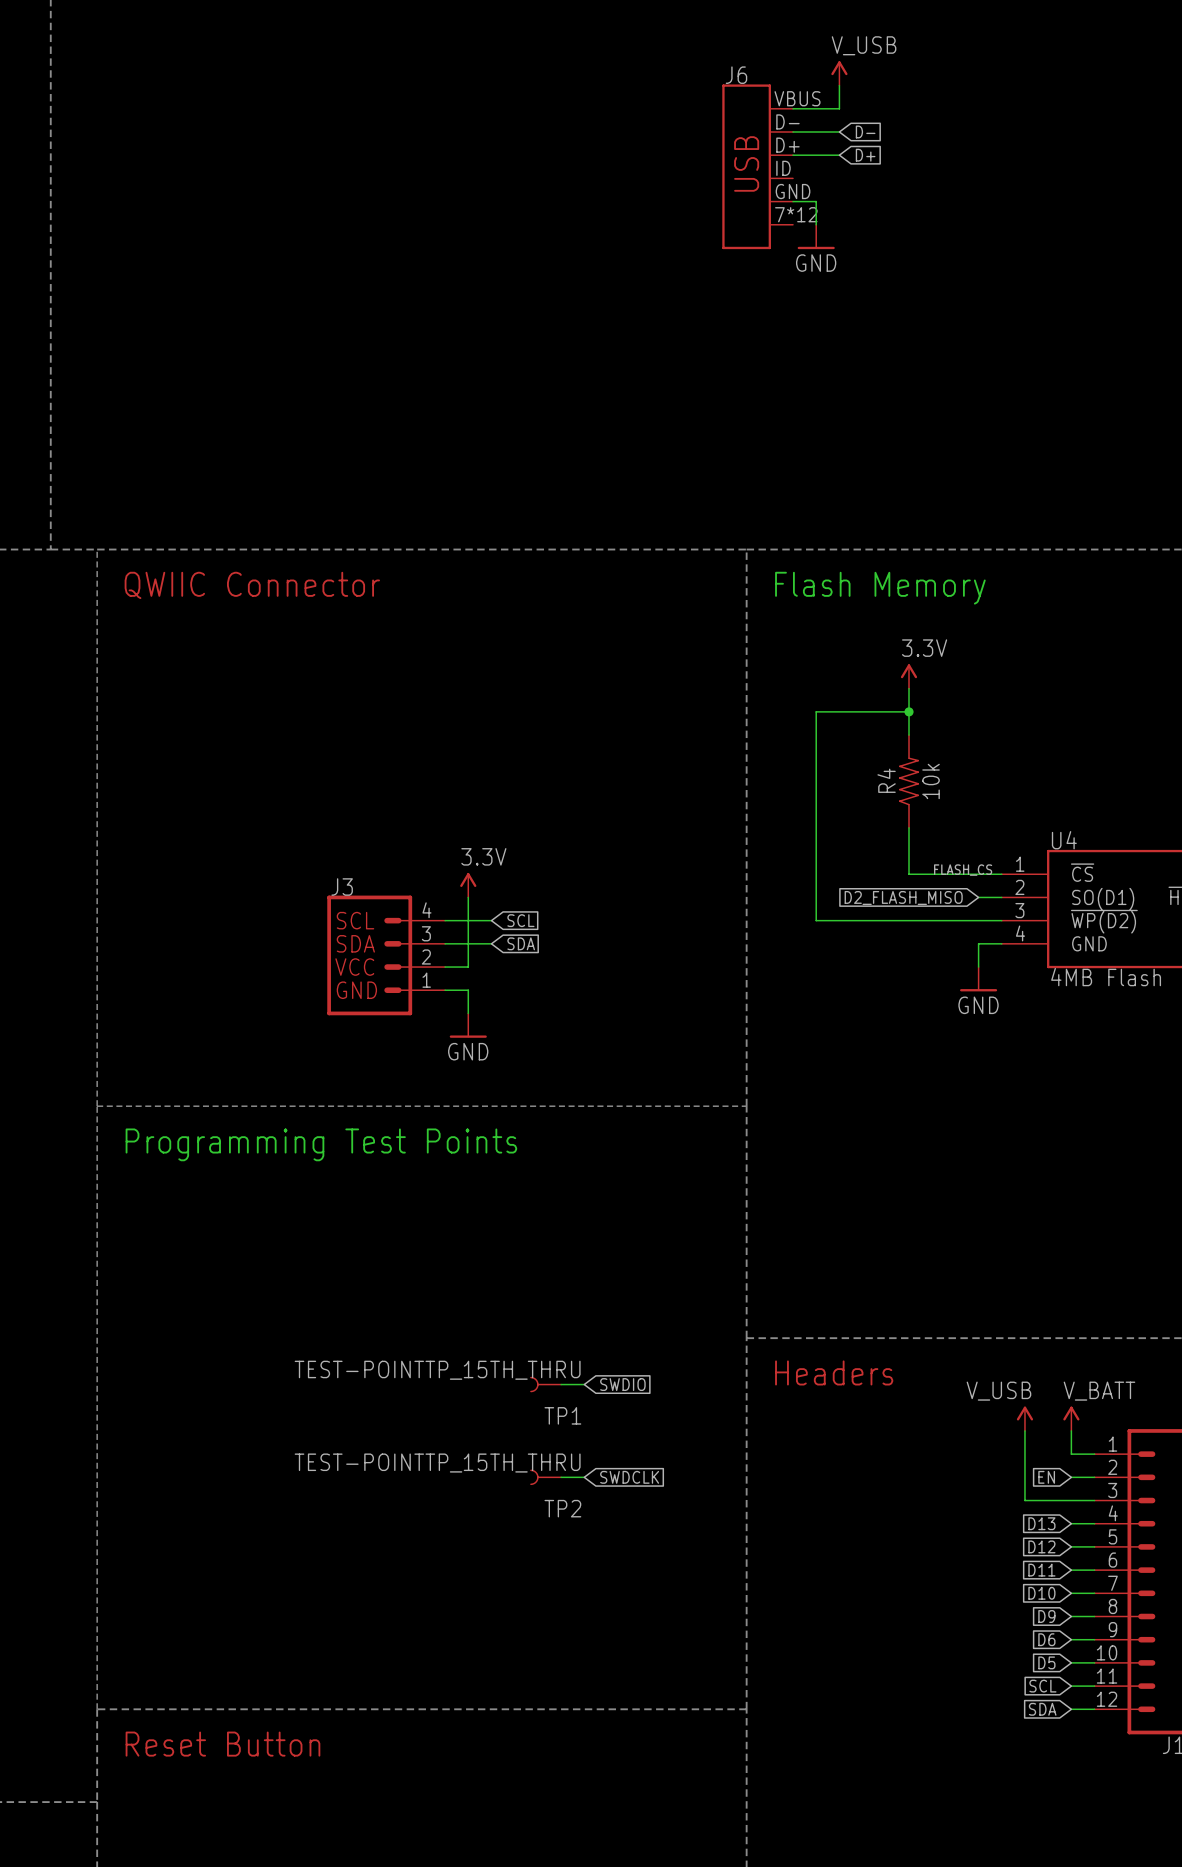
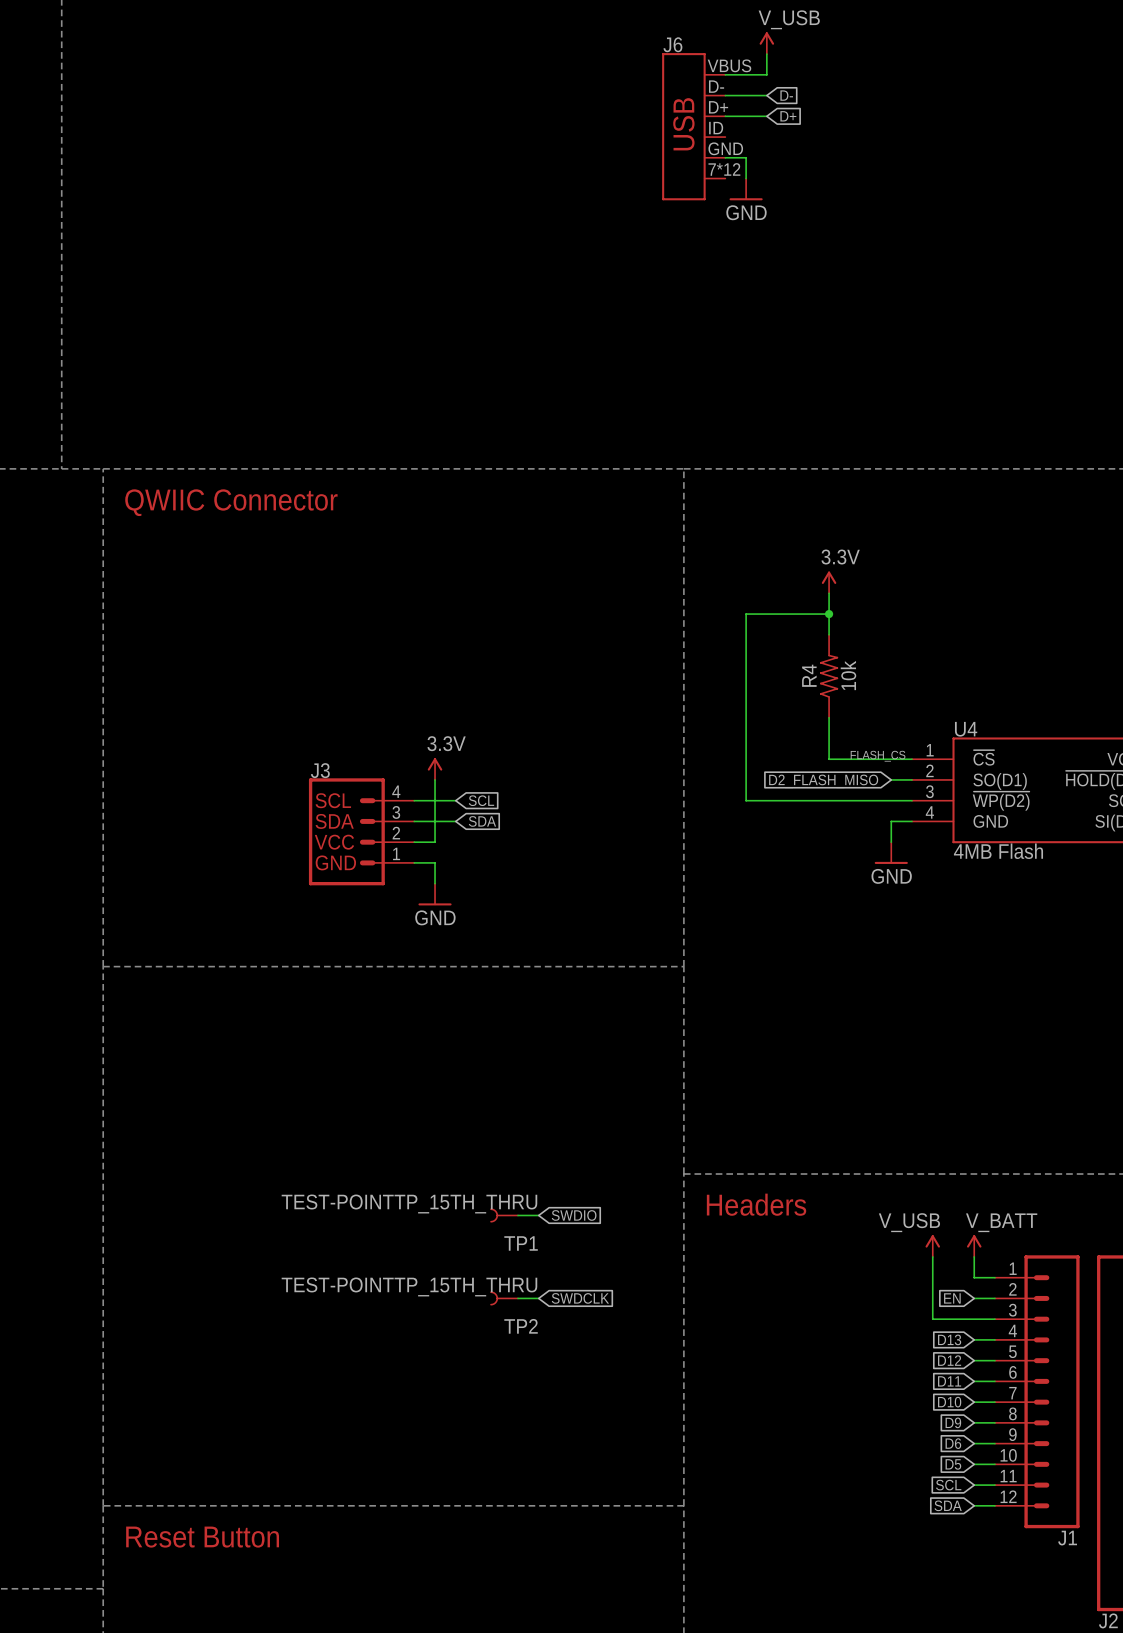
text: Flash Memory (880, 588) -> none
text: Programming Test Points (321, 1144) -> none

